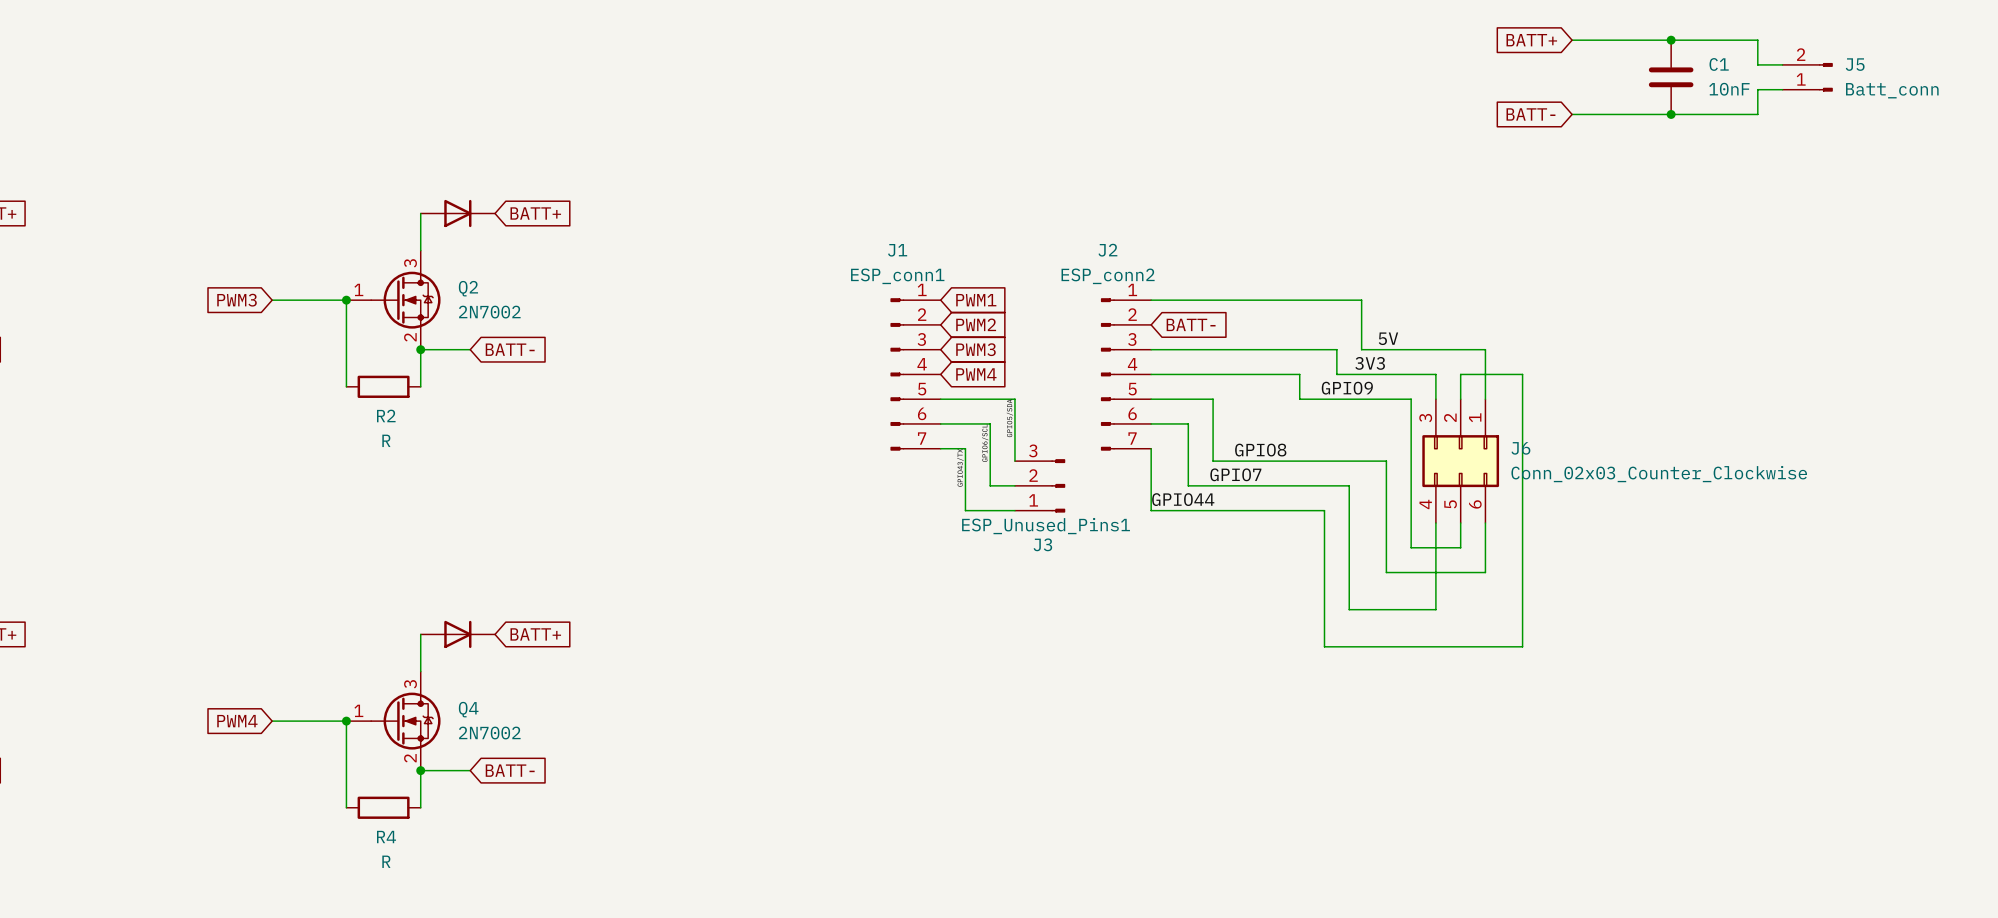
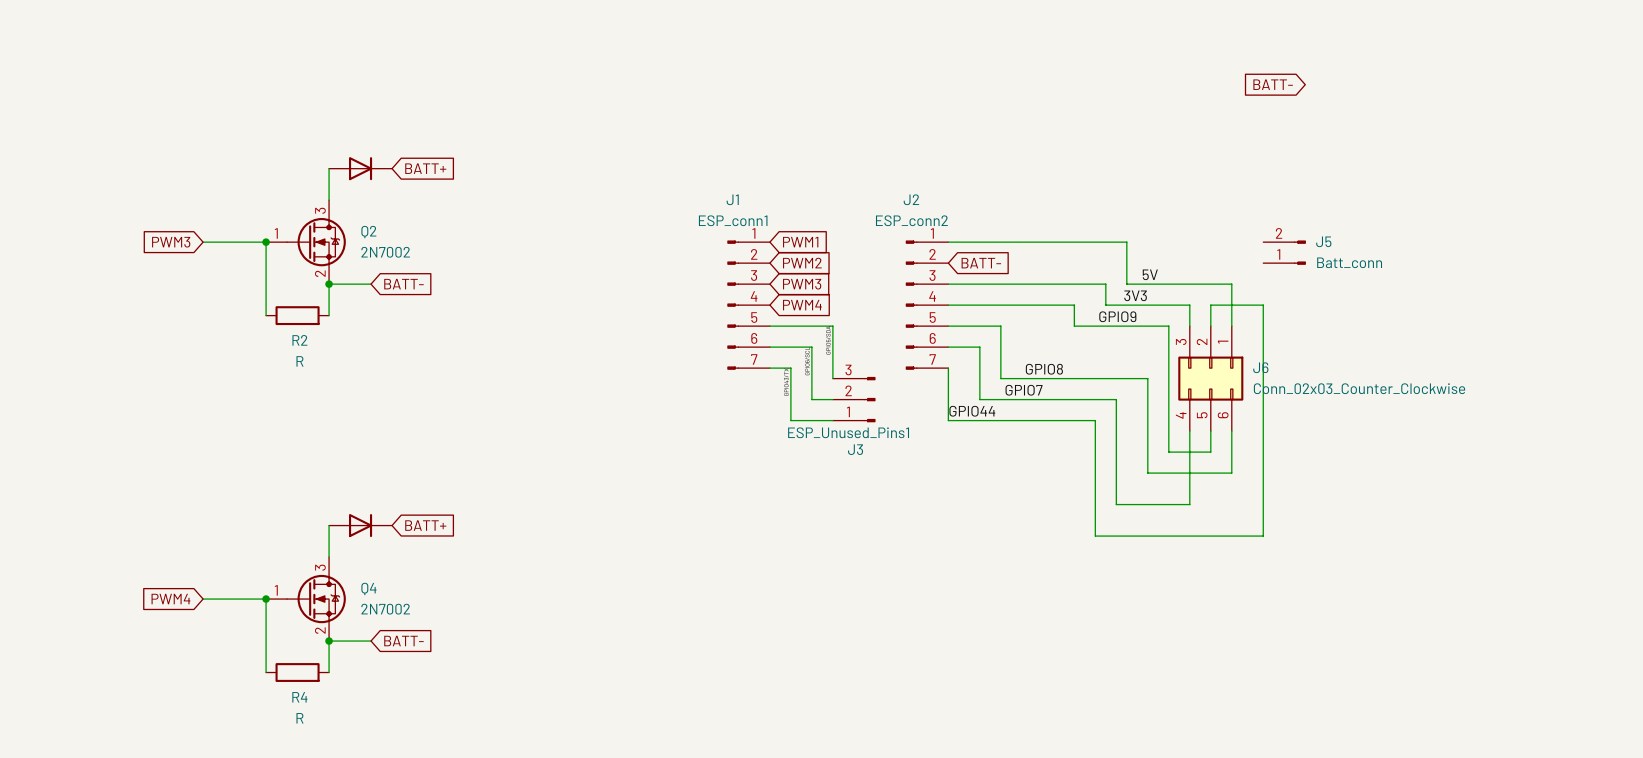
global label: BATT+ (1531, 40) -> none
wire: (1572, 40) (1757, 40) (1757, 64) (1782, 64) -> none
junction: (1671, 40) -> none
C1: 10nF (1671, 77) -> none
J5 position: (1807, 77) -> (1284, 252)
wire: (1782, 89) (1757, 89) (1757, 114) (1572, 114) -> none
junction: (1671, 114) -> none

